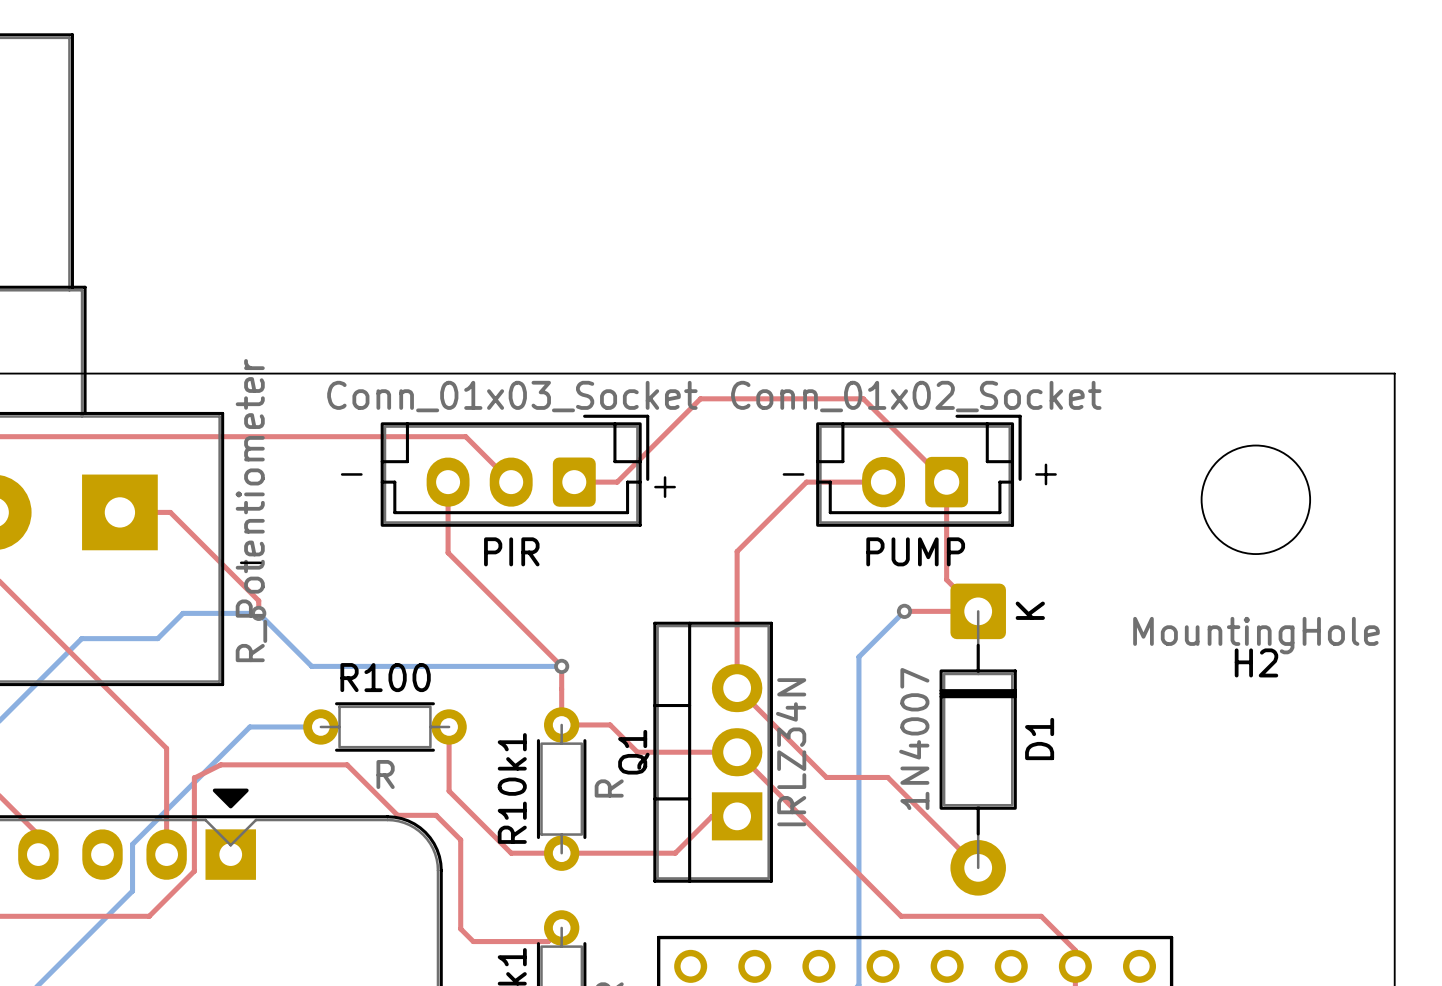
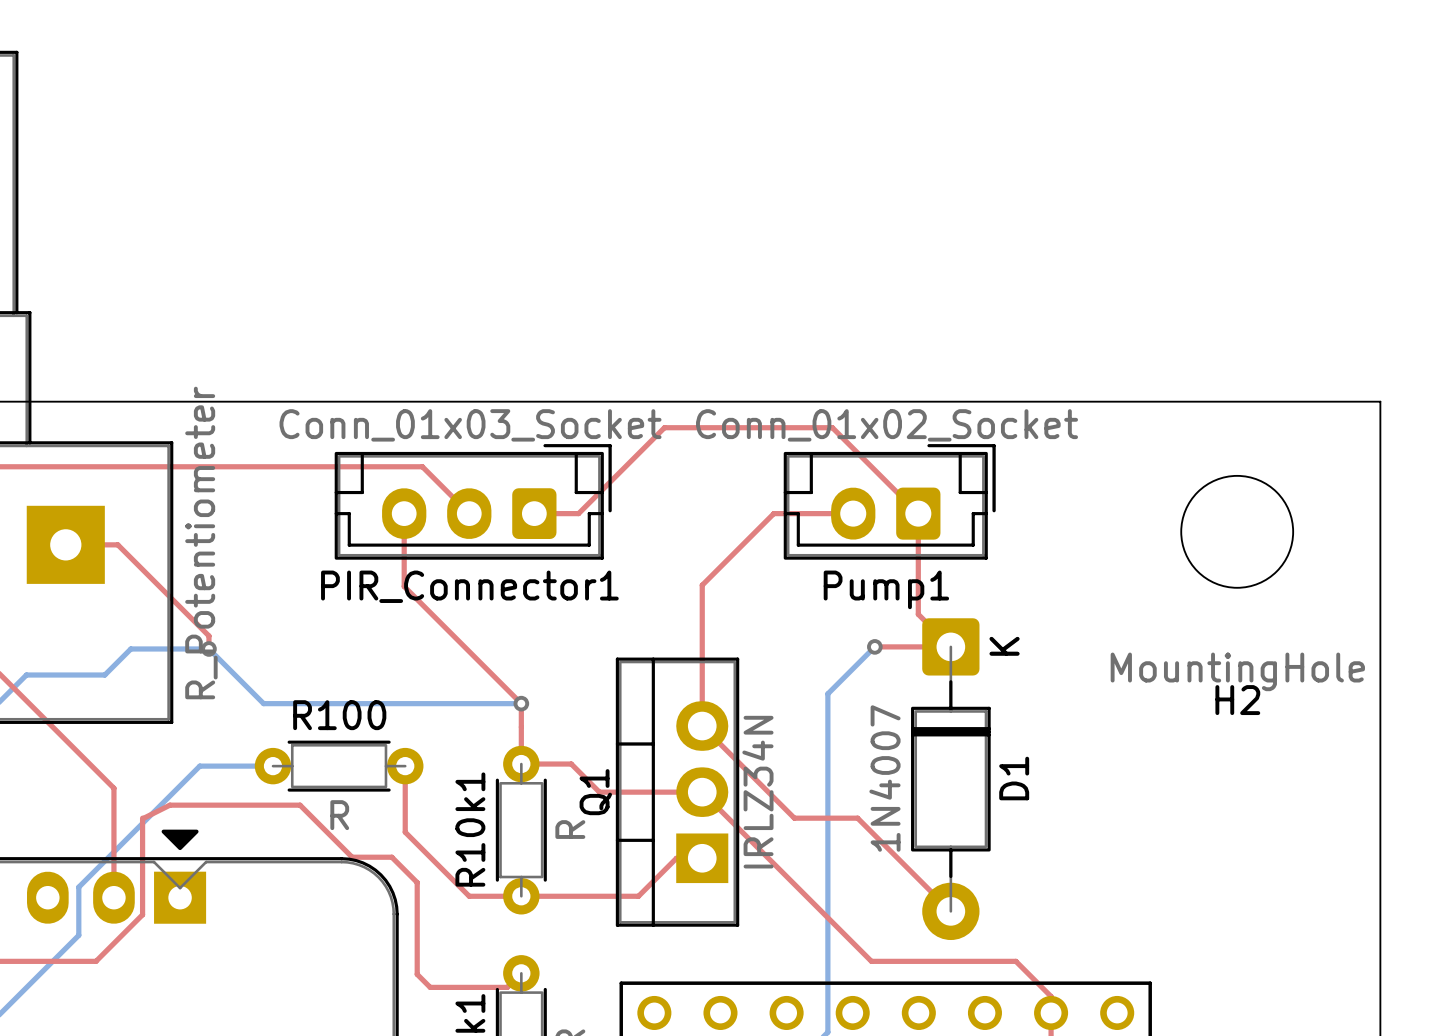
text: - (351, 474) -> none
text: - (793, 474) -> none
text: + (1045, 474) -> none
text: + (665, 487) -> none
PIR name: PIR (511, 551) -> PIR_Connector1 (469, 586)
PUMP name: PUMP (915, 551) -> Pump1 (886, 589)
text: - (250, 562) -> none

